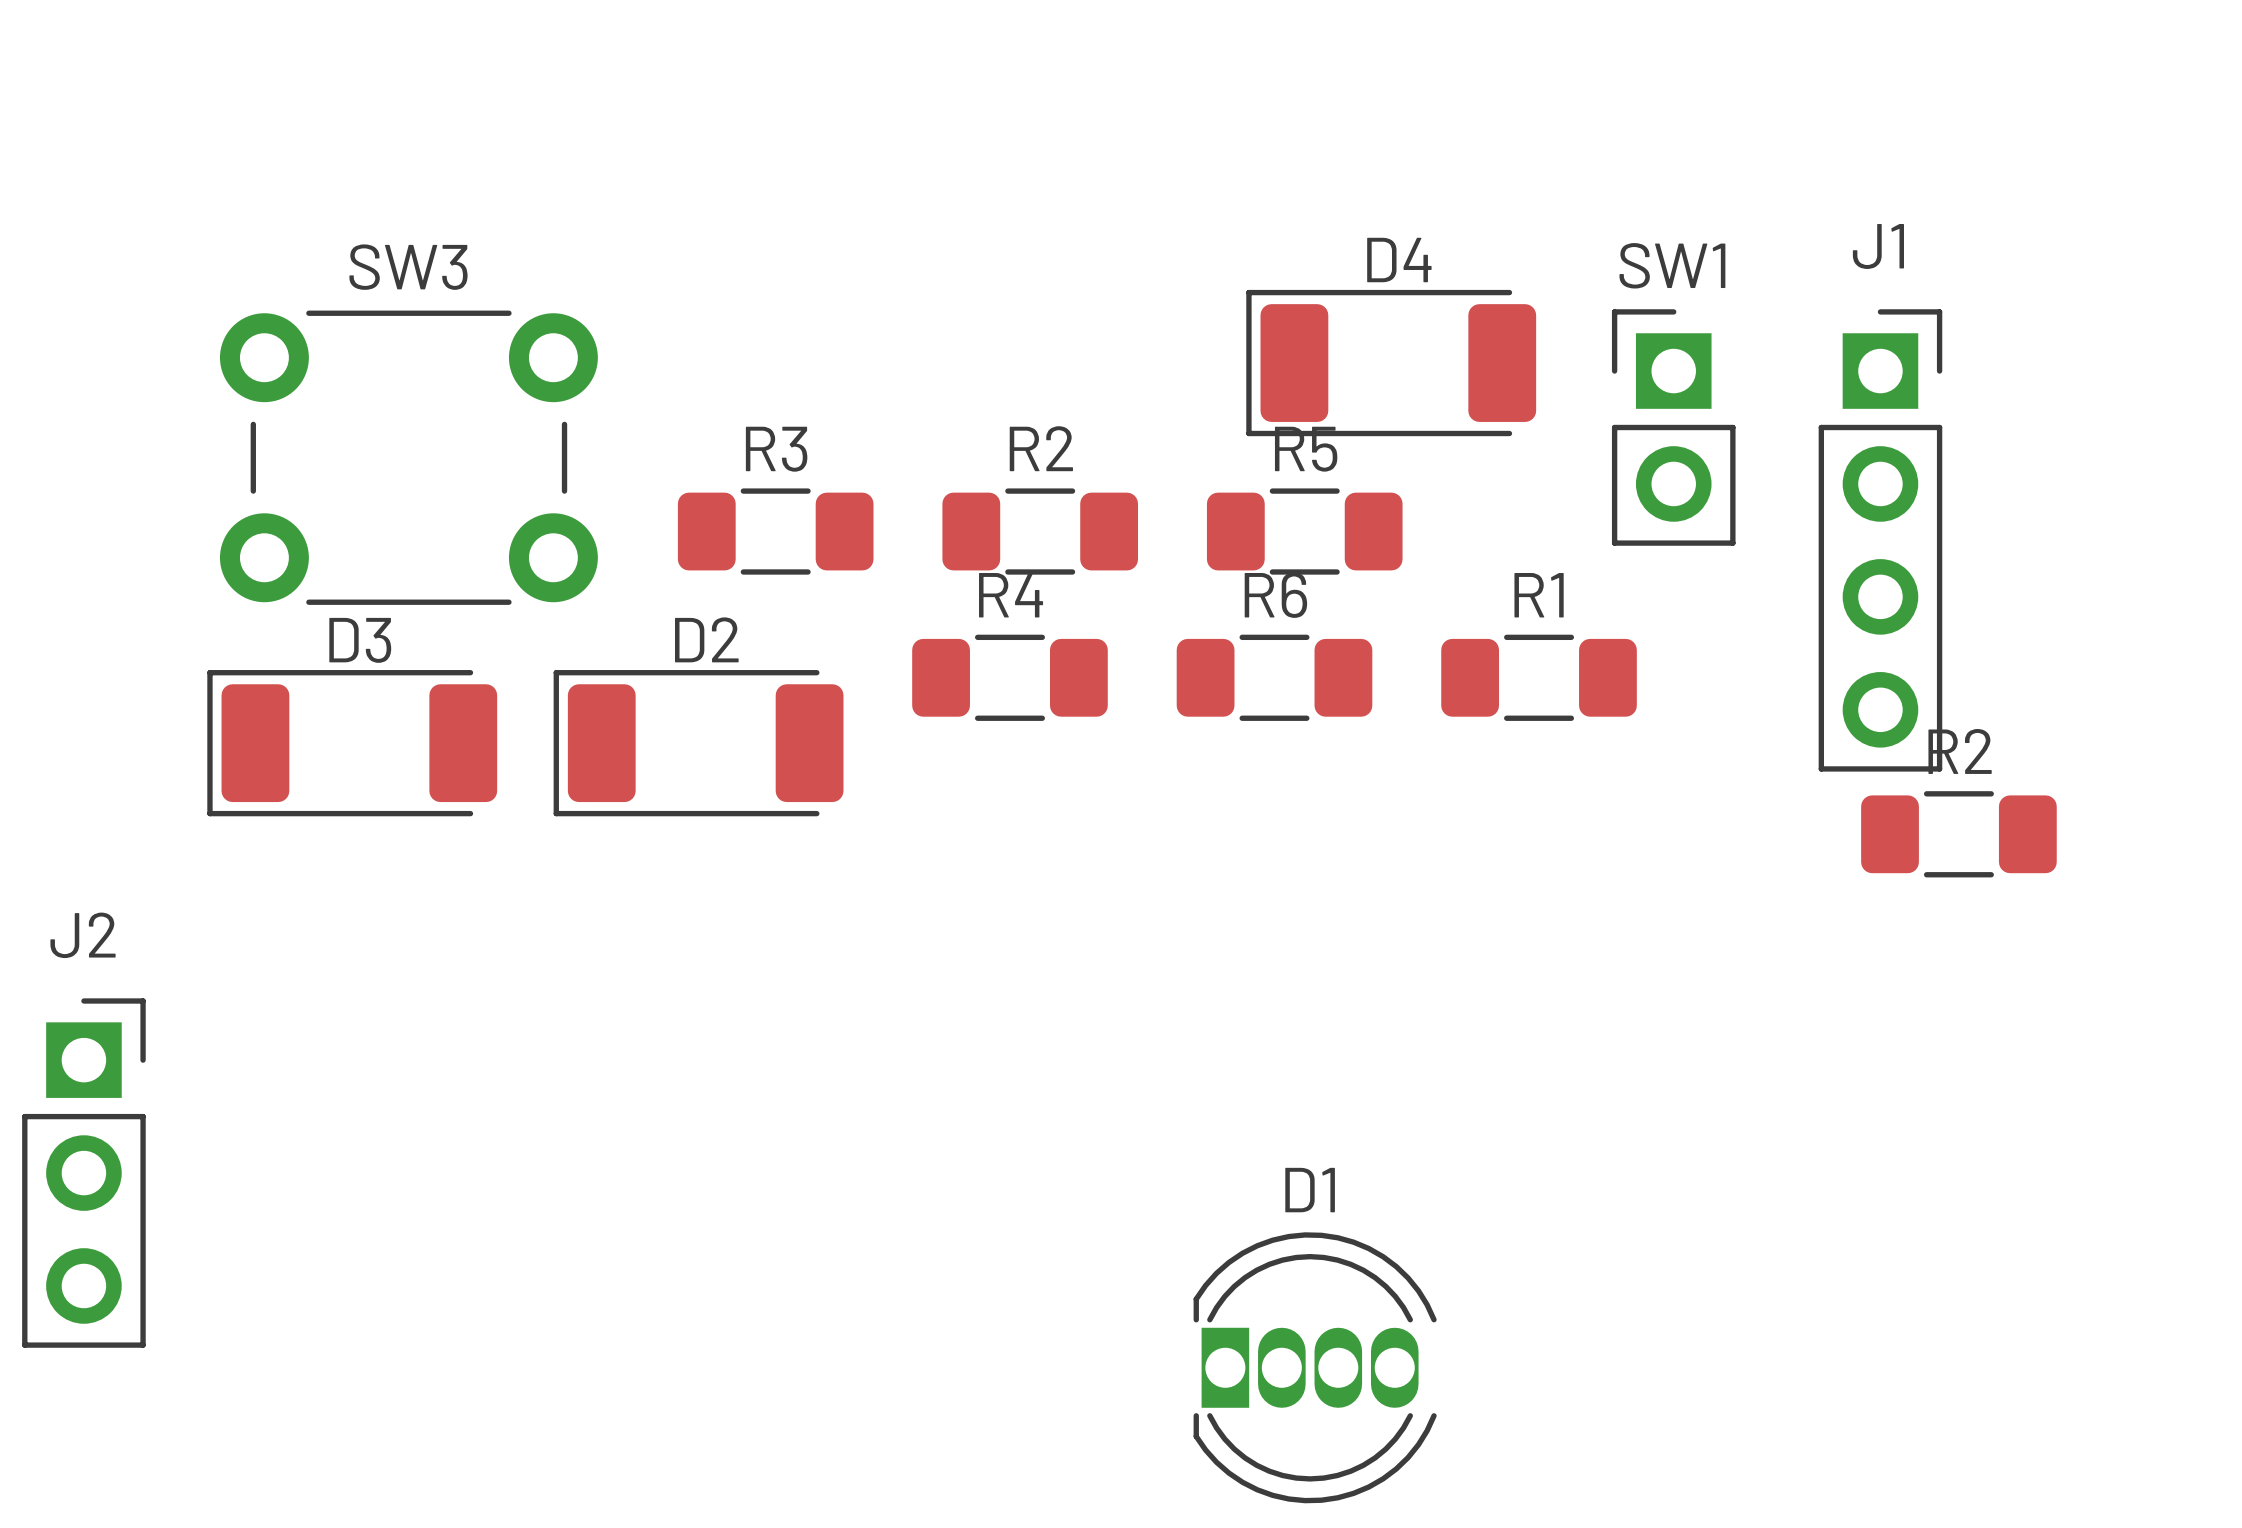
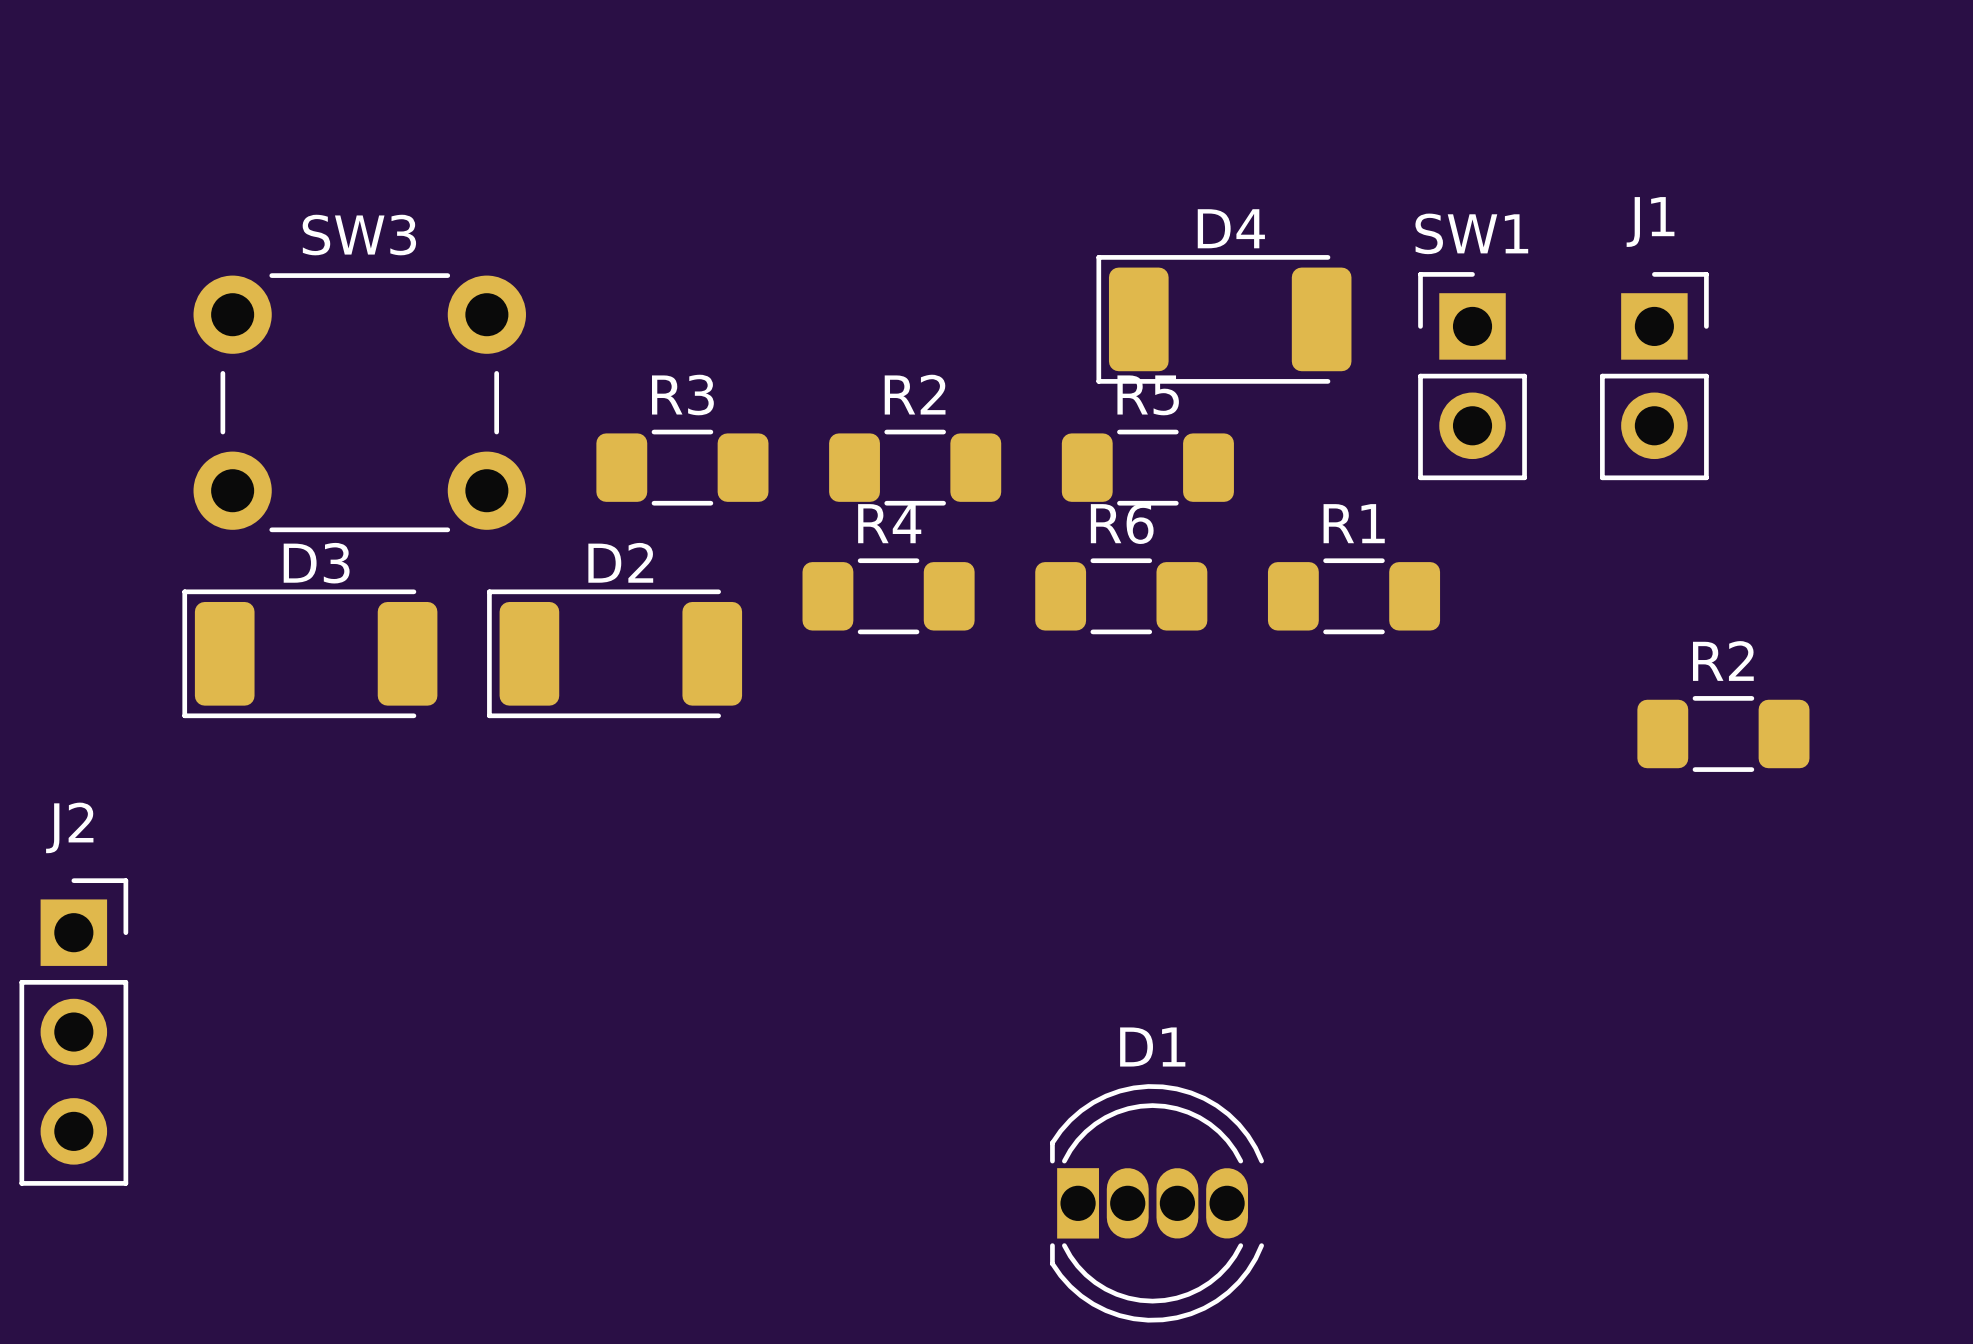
J1 footprint: [1818, 309, 1943, 772] -> [1600, 272, 1709, 481]

